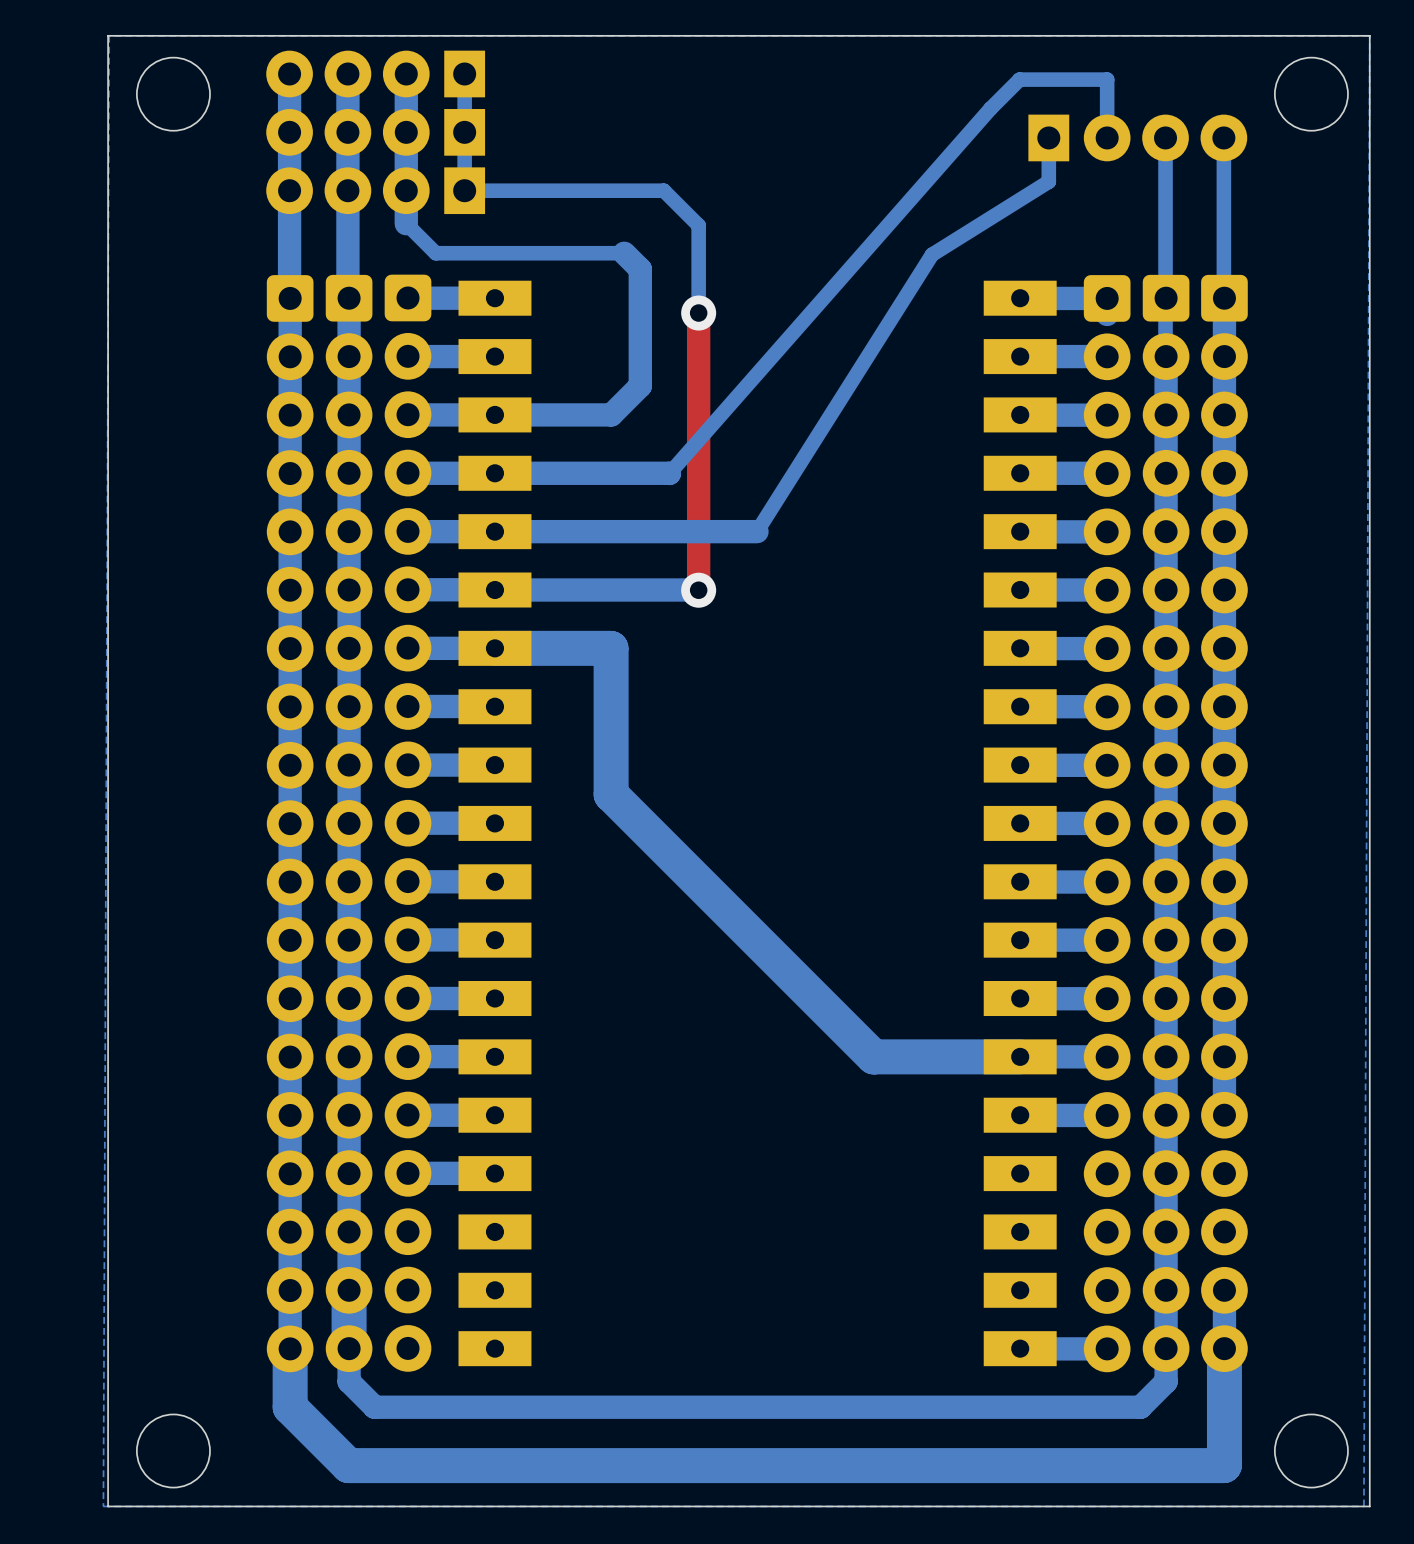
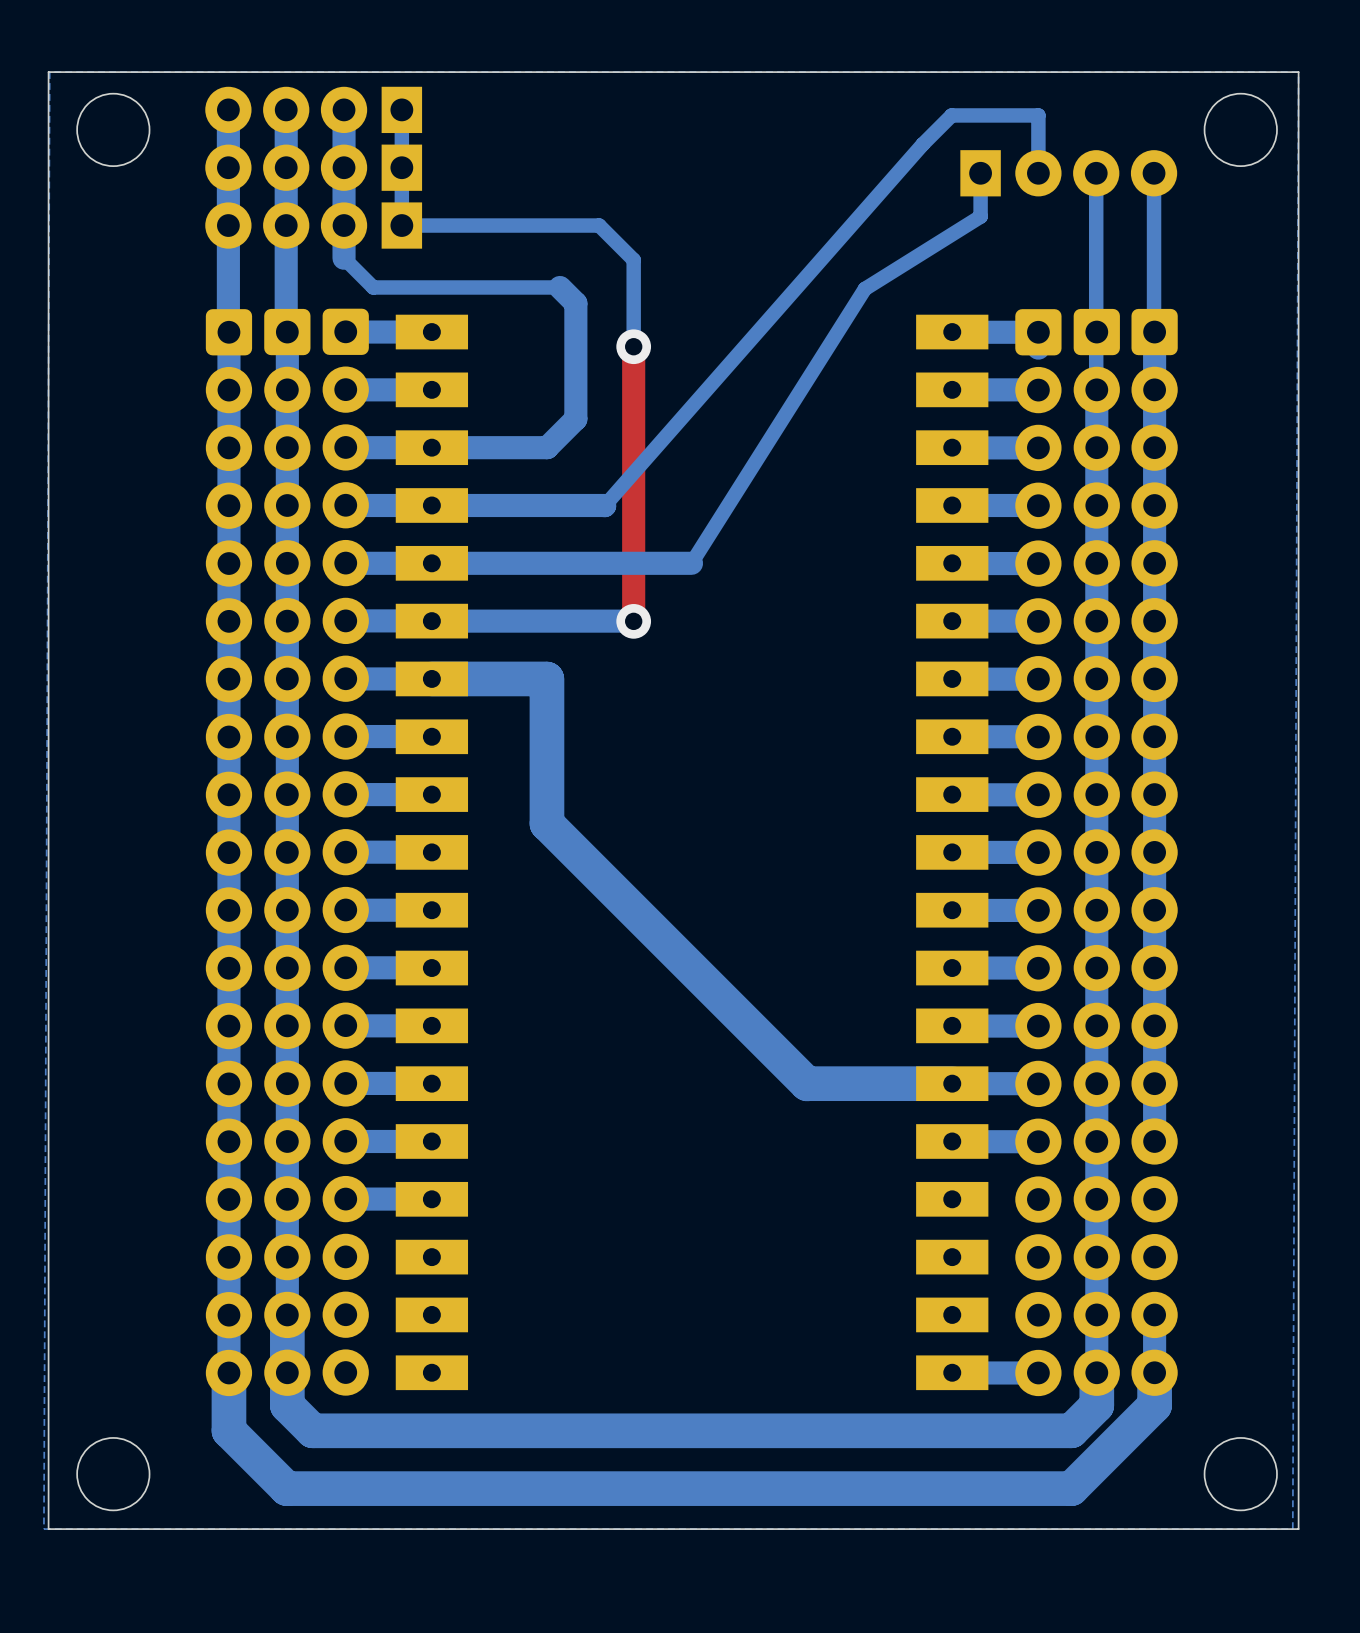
bottom track width: thin (1166, 1348) (1166, 1381) (1140, 1407) (374, 1407) (349, 1381) (349, 1348) -> thick (1096, 1372) (1096, 1405) (1071, 1430) (312, 1430) (287, 1405) (287, 1372)
bottom track: (1224, 1381) (1224, 1465) (1140, 1465) -> (1154, 1405) (1071, 1488)

